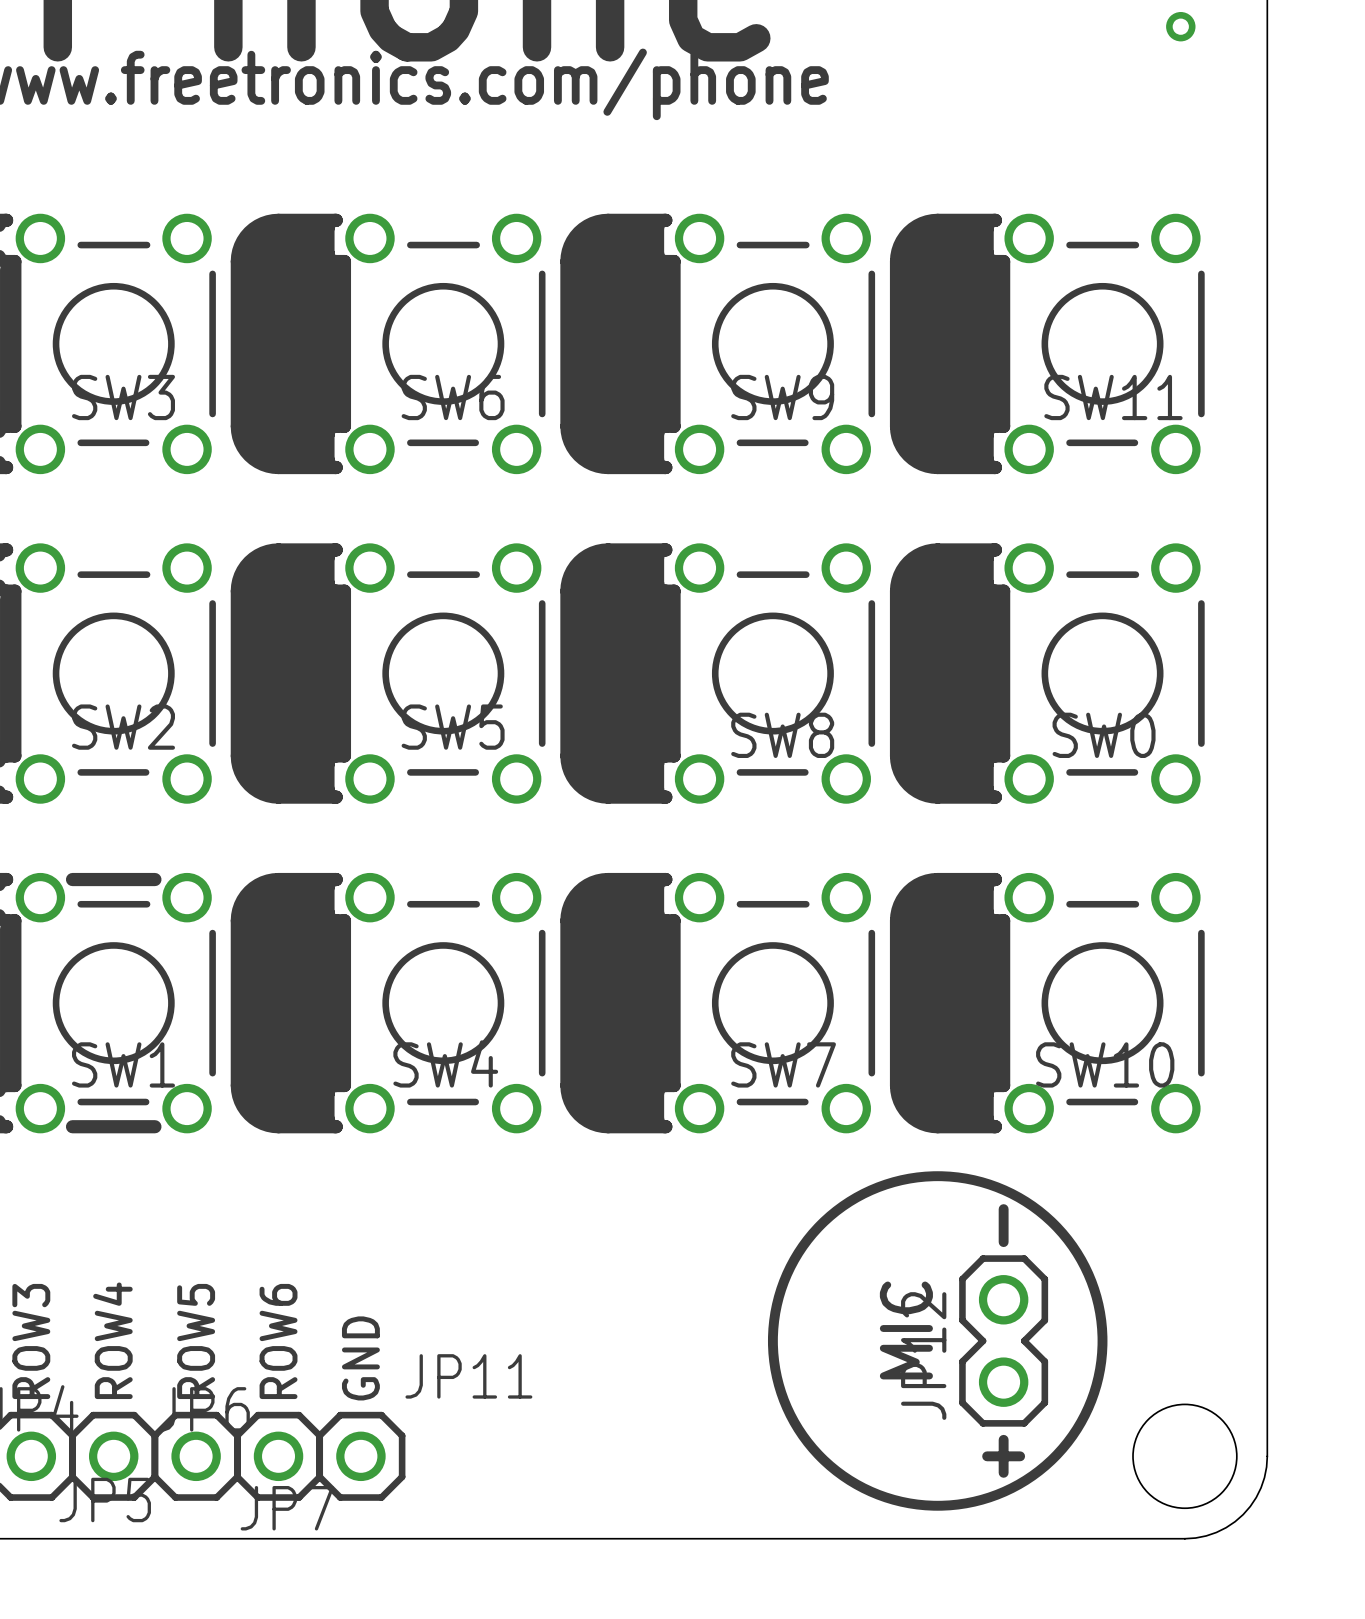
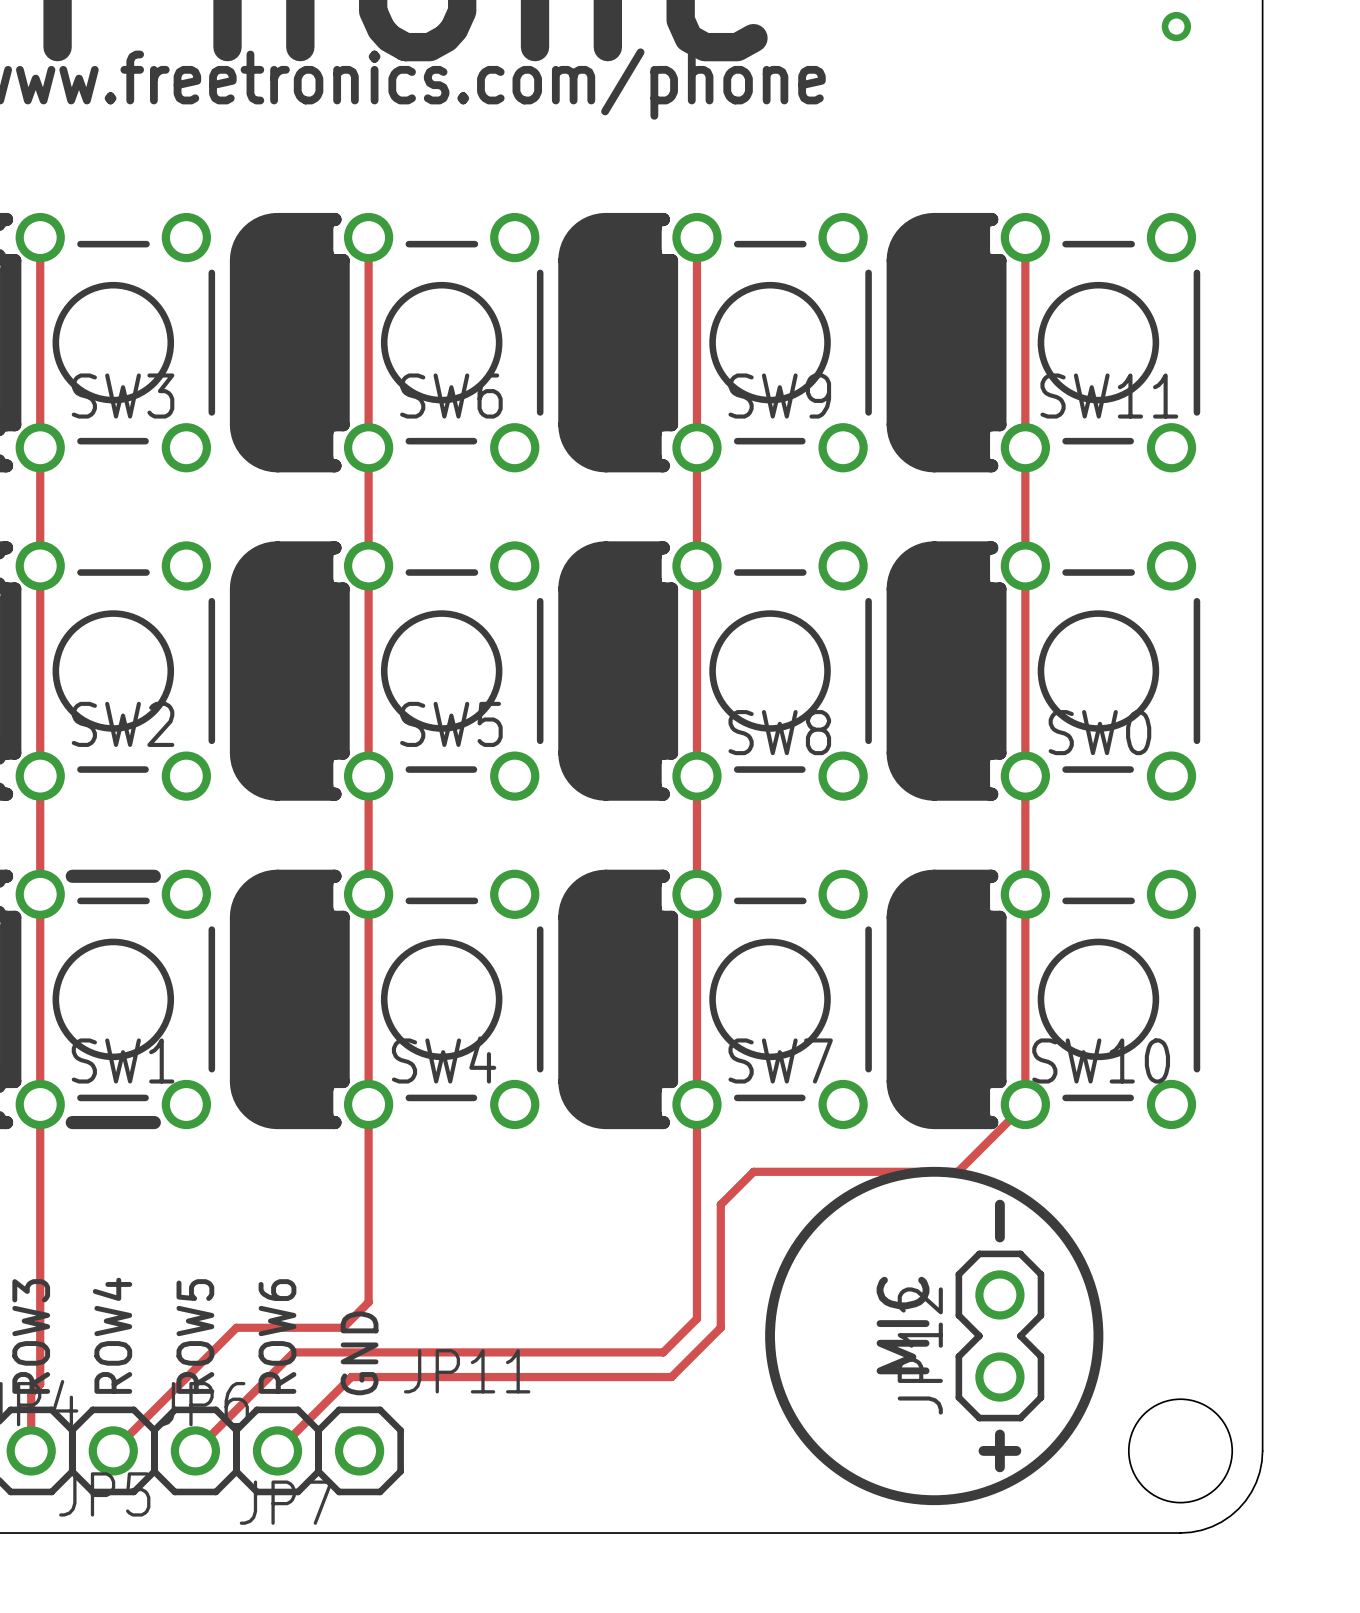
track: none -> (40, 237) (40, 1384) (31, 1393) (31, 1450)
track: none -> (368, 237) (368, 1302) (343, 1327) (236, 1327) (113, 1450)
track: none -> (696, 237) (696, 1318) (663, 1352) (293, 1352) (195, 1450)
track: none -> (1025, 237) (1025, 1104) (958, 1171) (753, 1171) (720, 1204) (720, 1327) (671, 1377) (351, 1377) (277, 1450)

